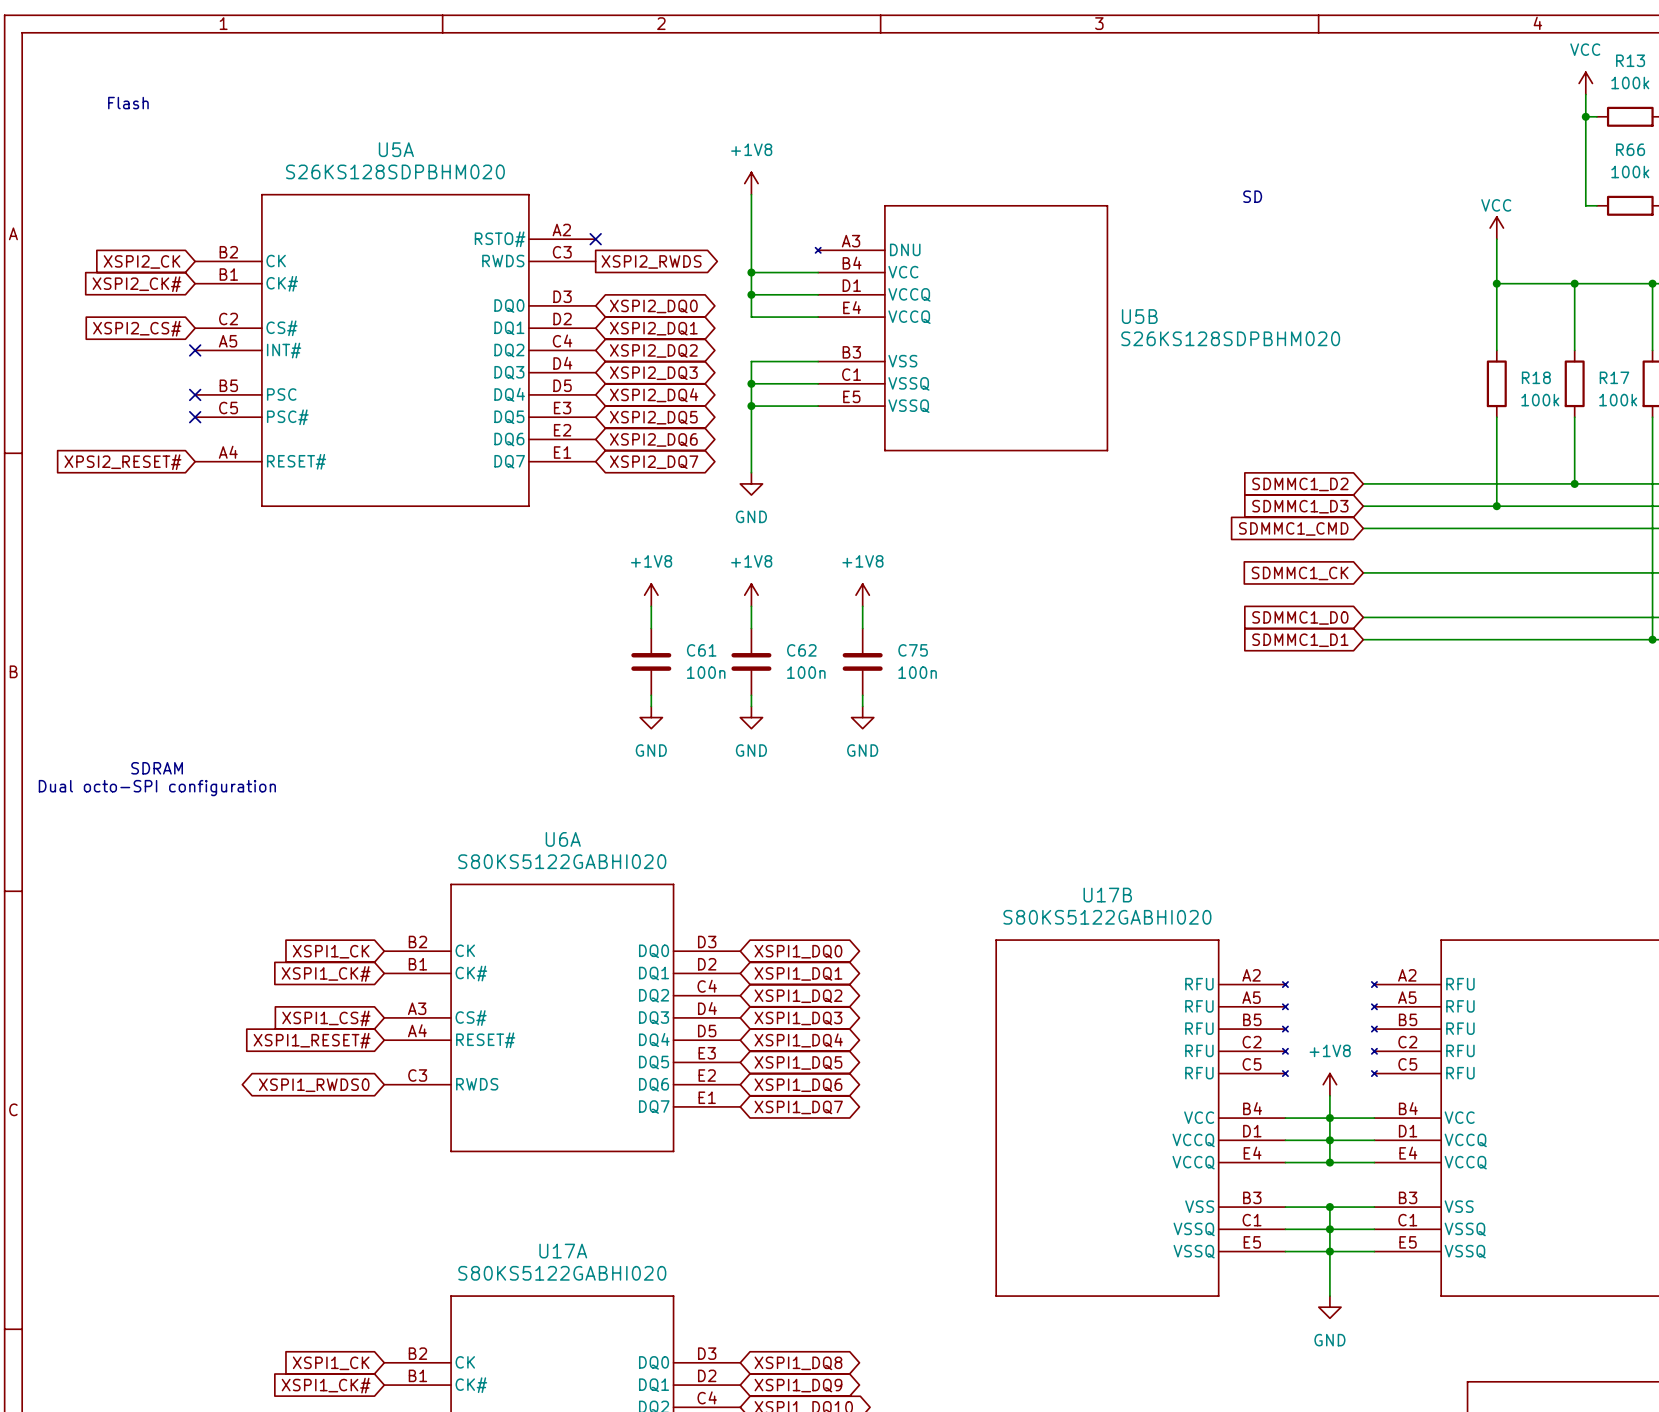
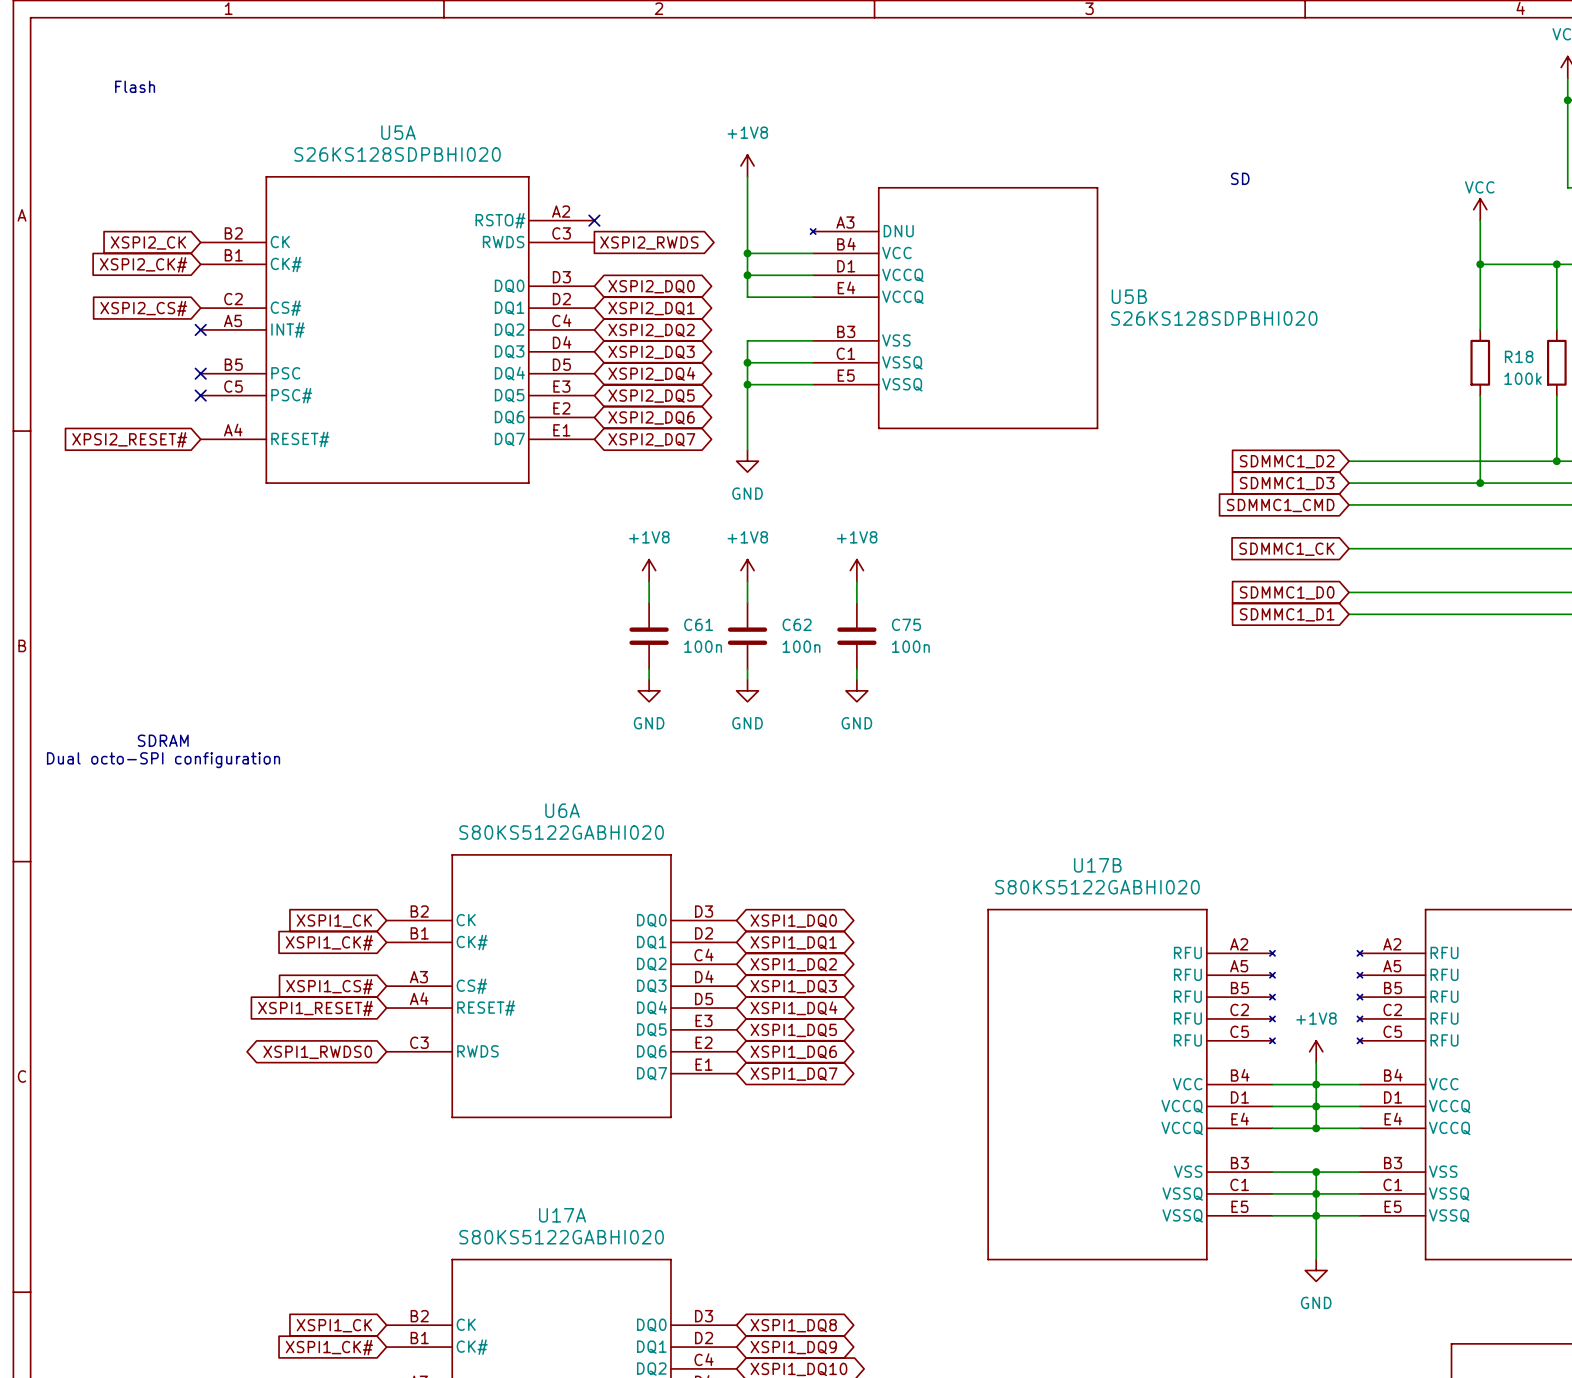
U5A value: S26KS128SDPBHM020 (395, 171) -> S26KS128SDPBHI020 (397, 154)
U5B value: S26KS128SDPBHM020 (1230, 338) -> S26KS128SDPBHI020 (1214, 318)

